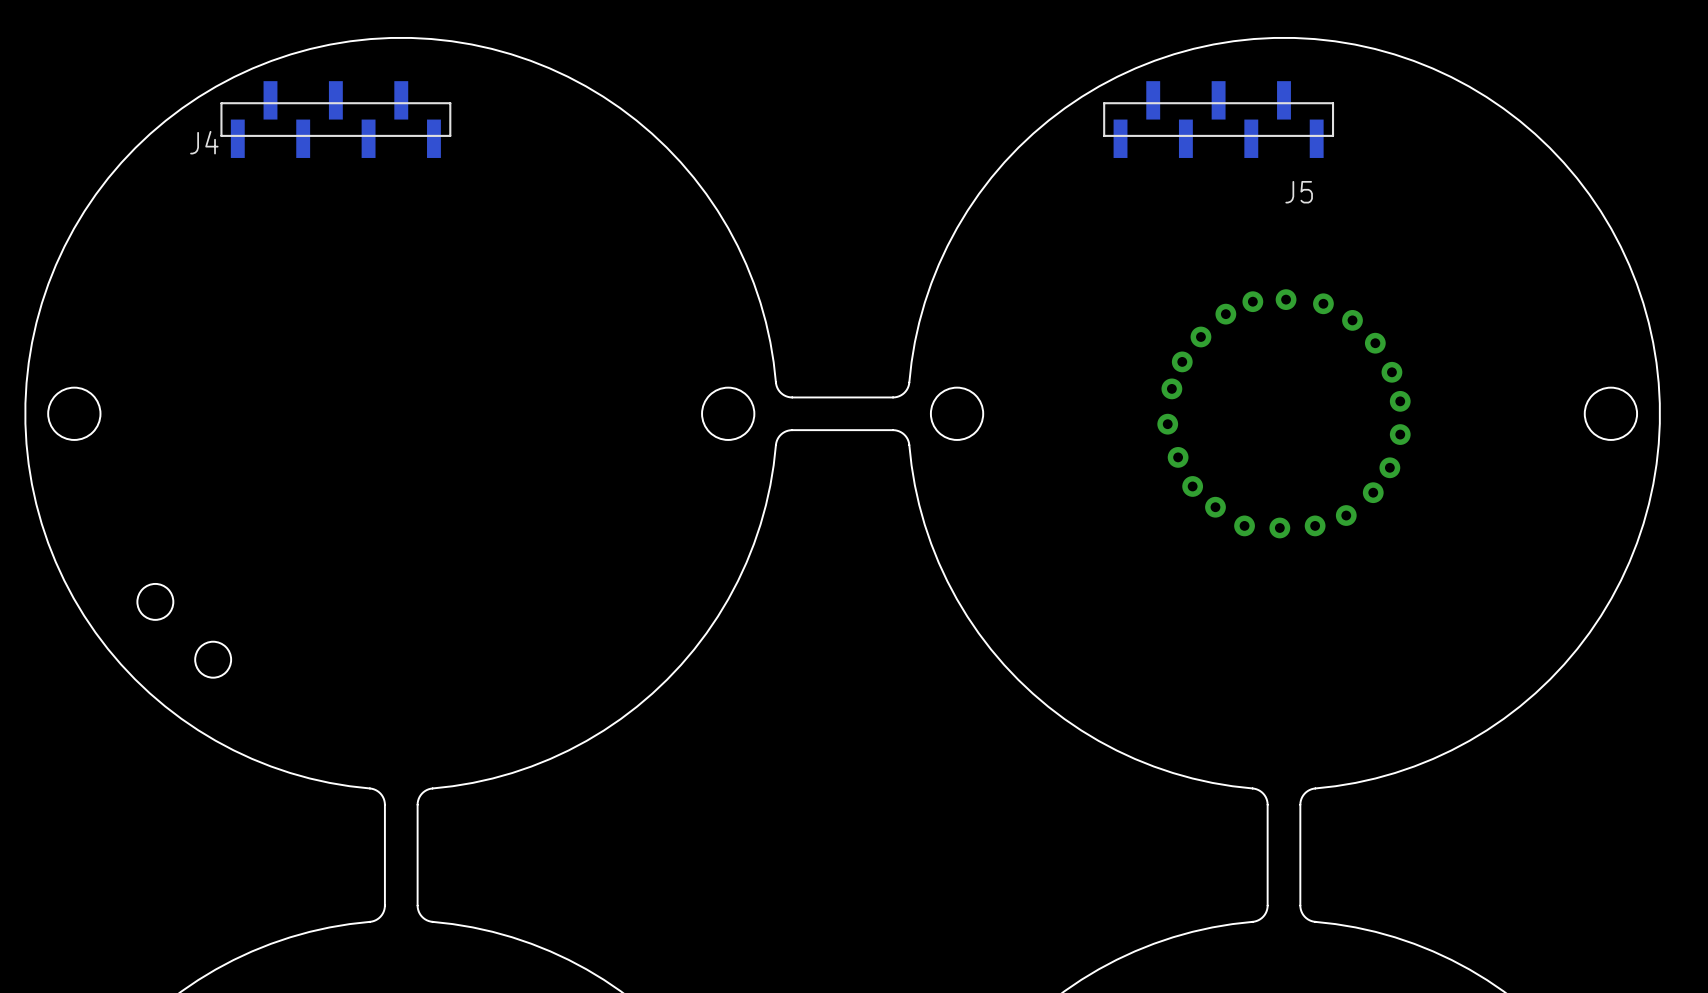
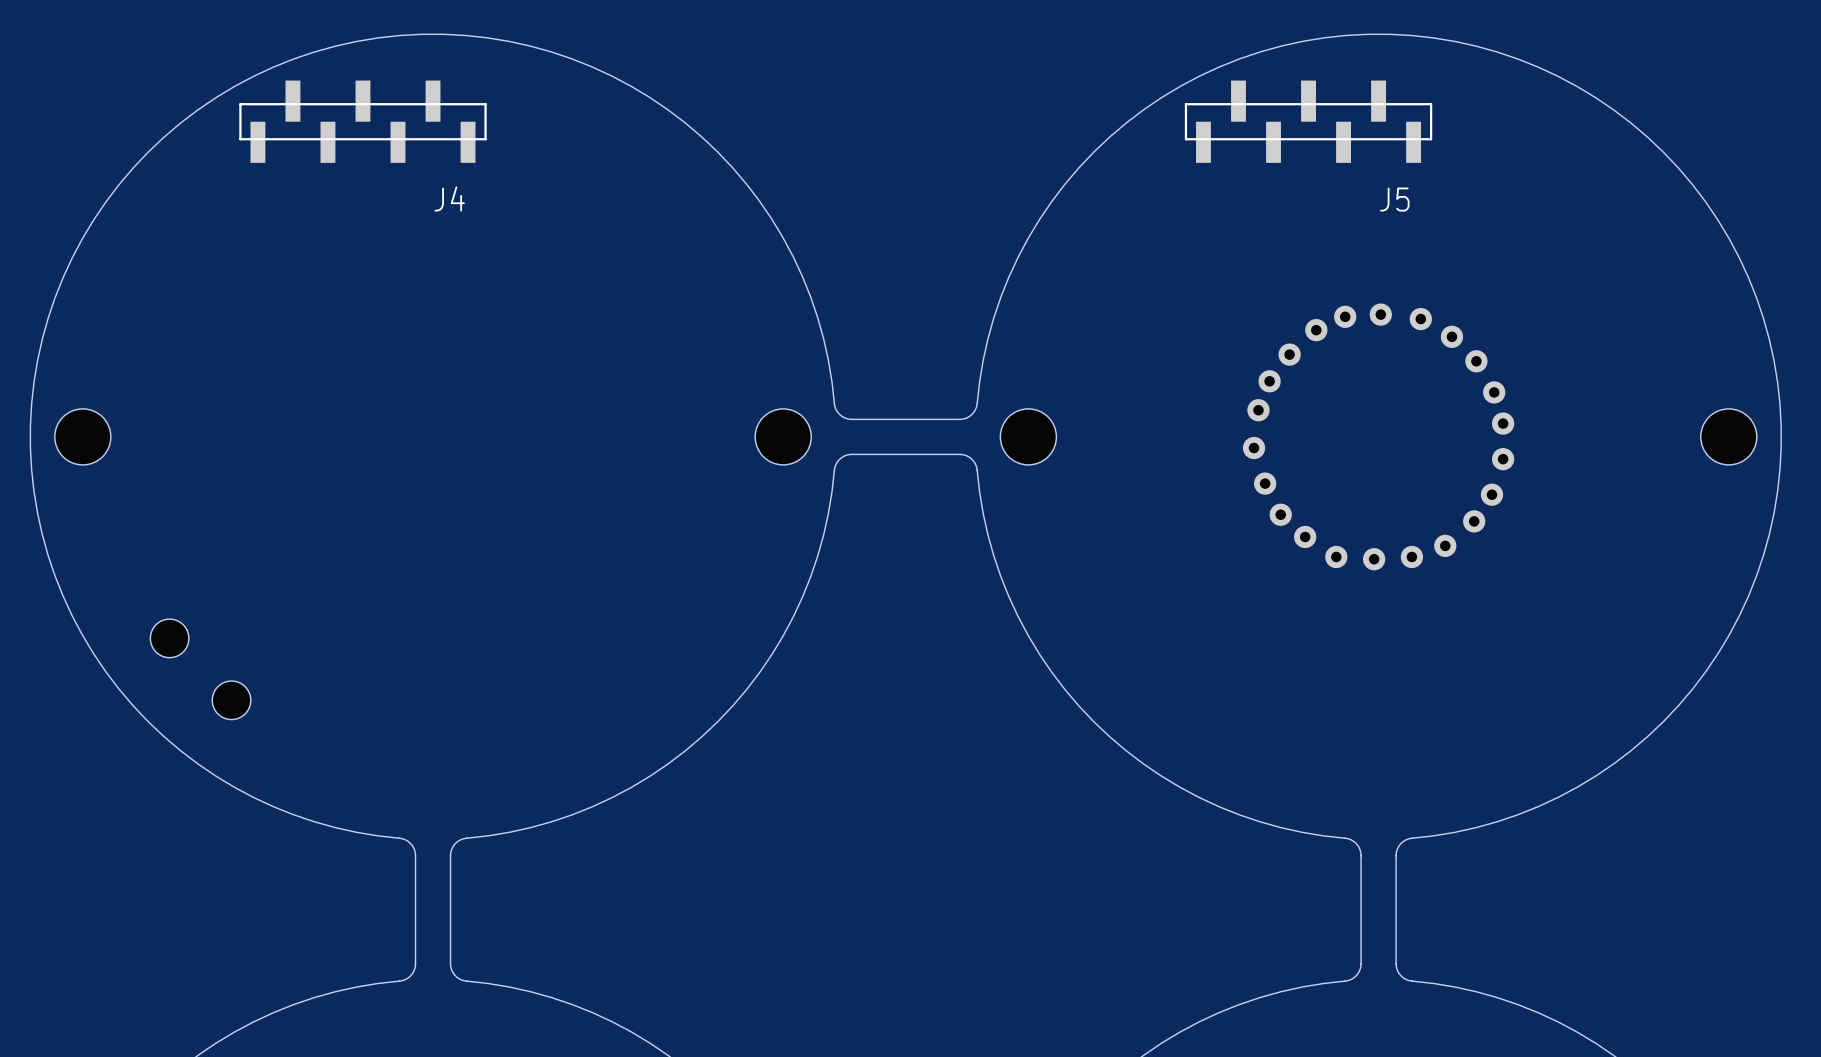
J4 name position: J4 (204, 142) -> J4 (449, 199)

